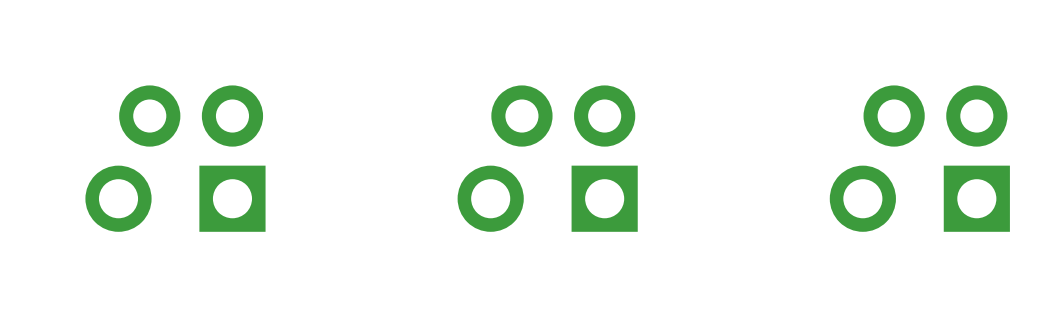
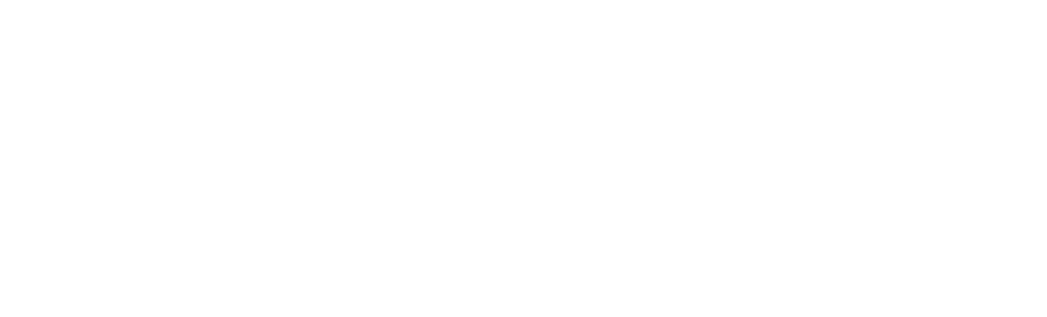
part: (191, 116) -> none
part: (563, 116) -> none
part: (935, 116) -> none
part: (175, 198) -> none
part: (547, 198) -> none
part: (919, 198) -> none

